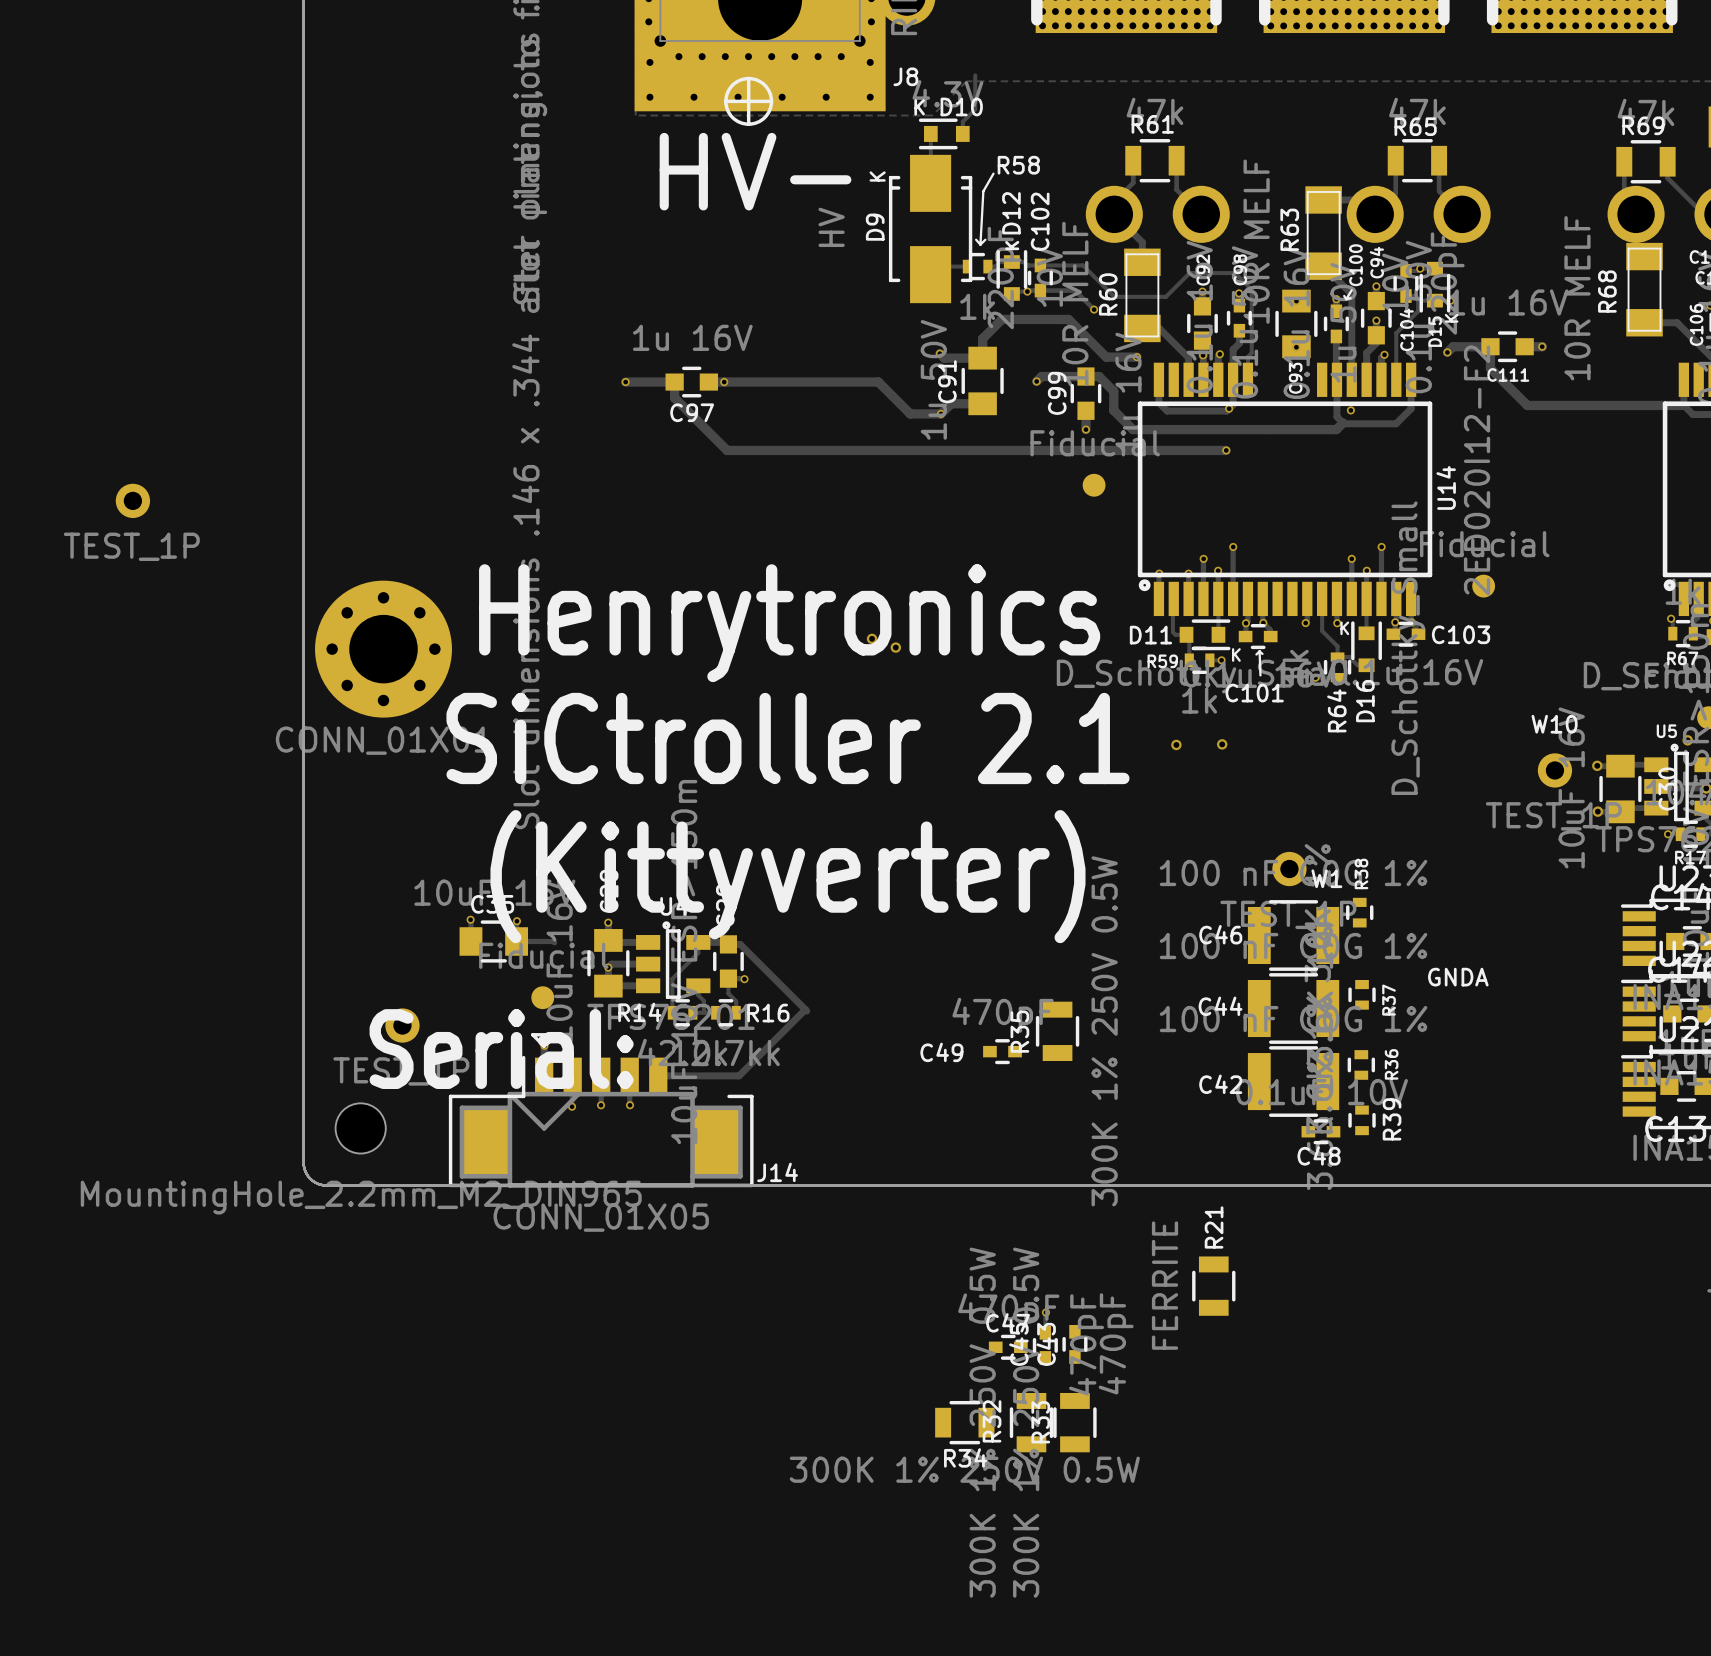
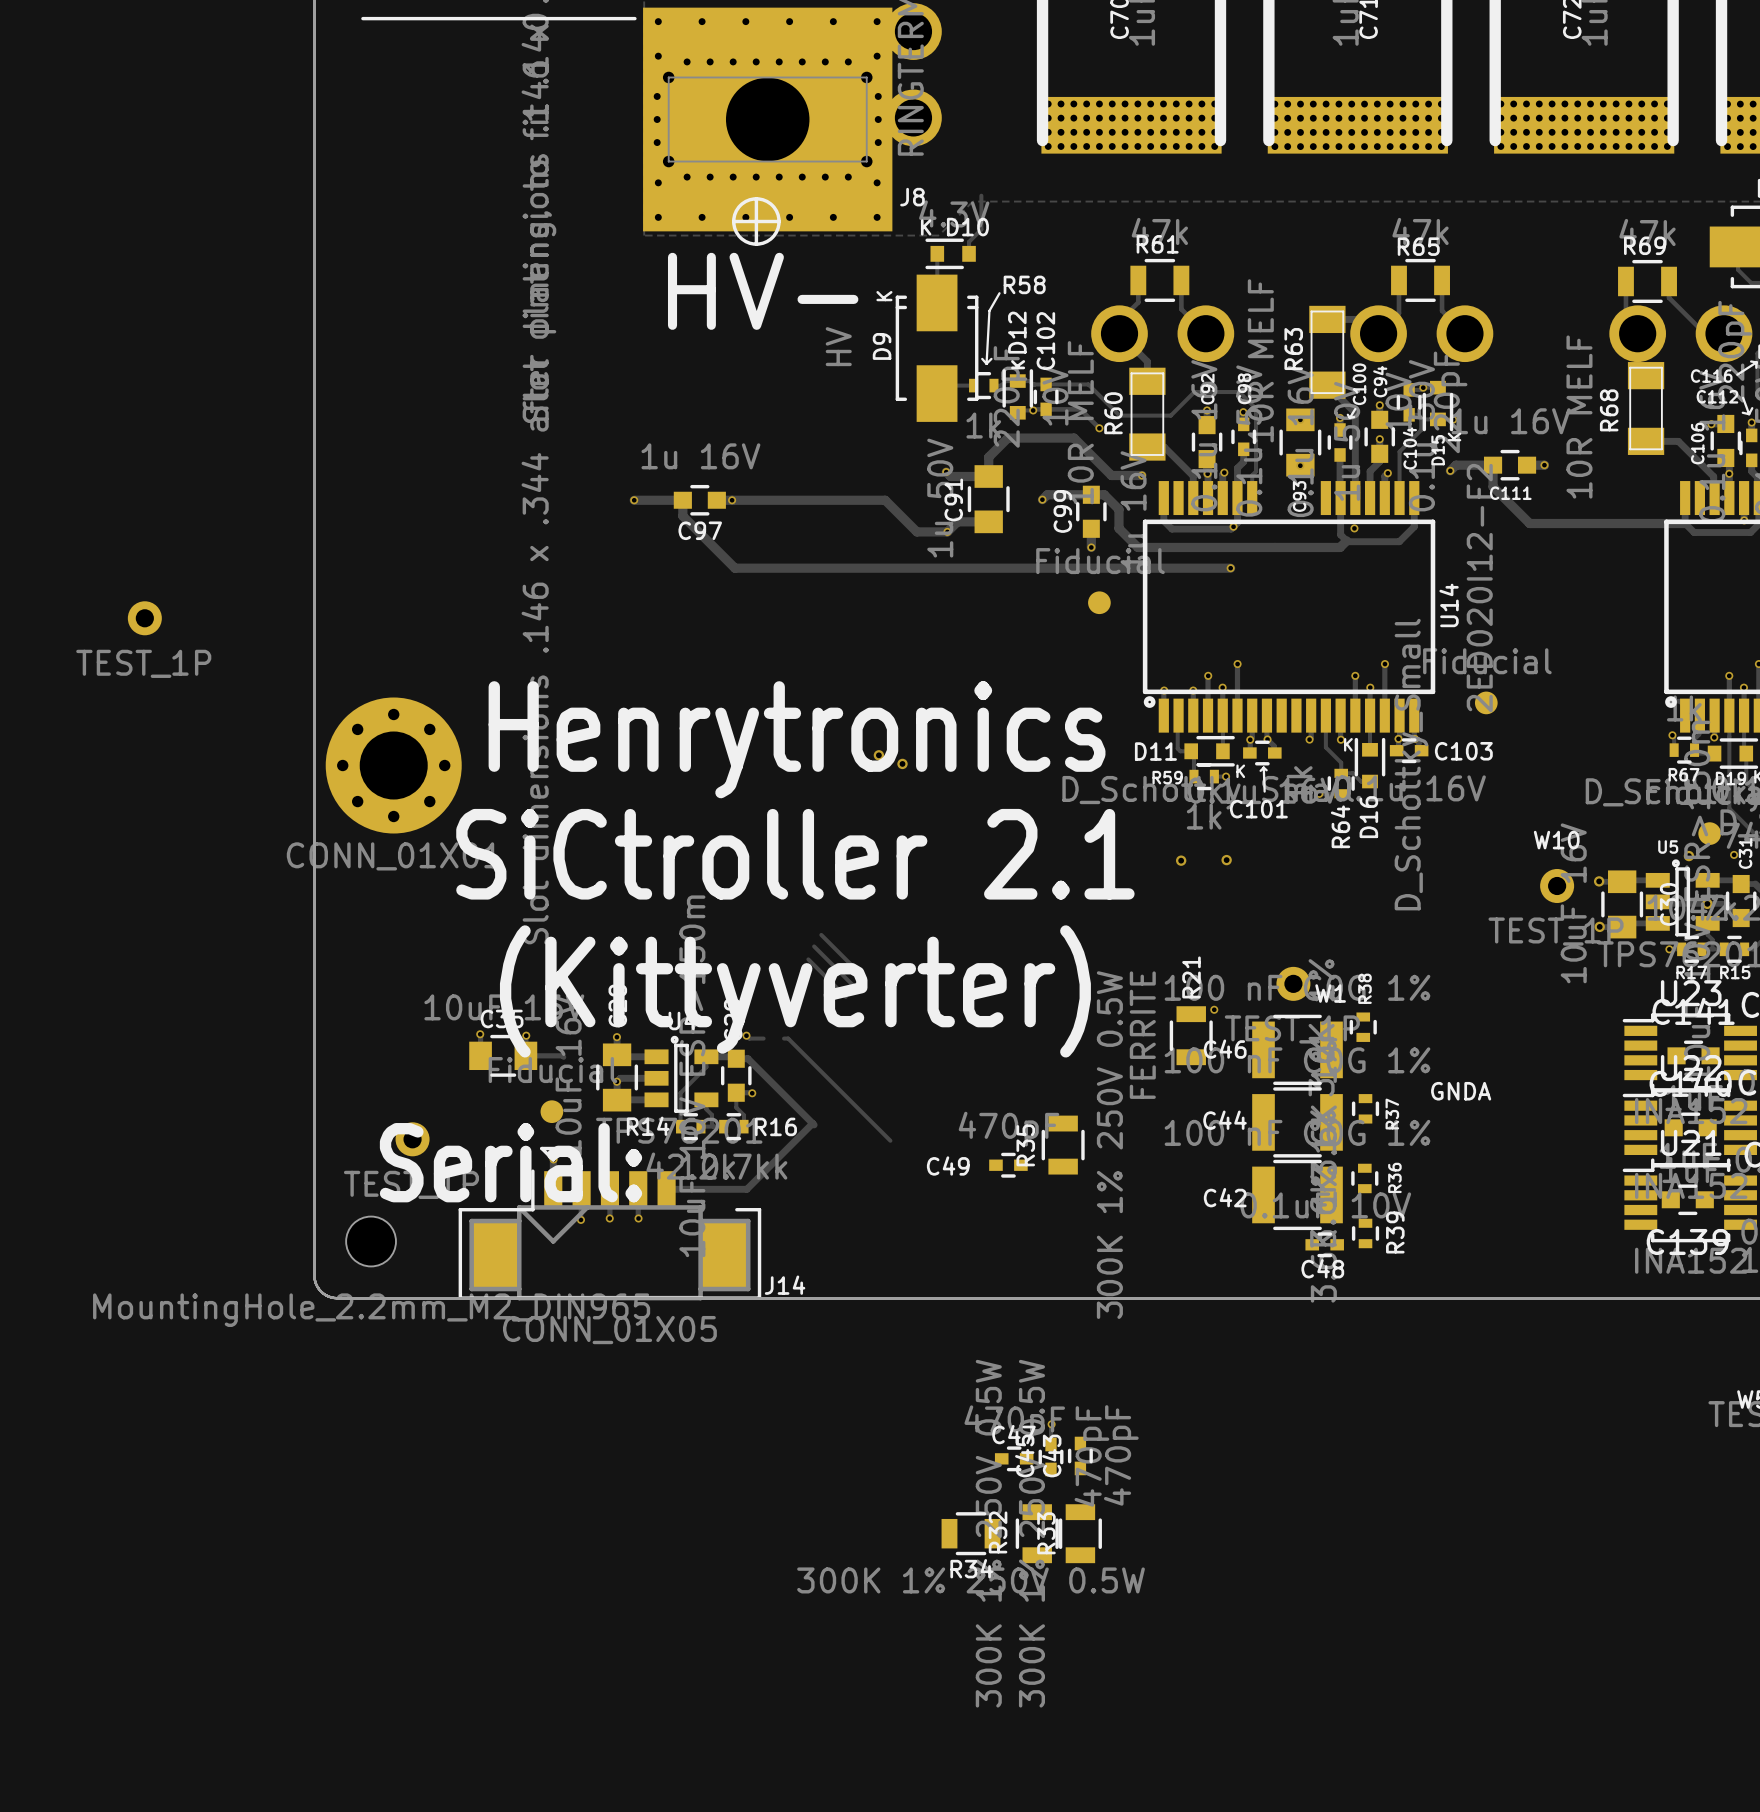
track: none -> (821, 934) (863, 975)
track: none -> (814, 946) (854, 986)
track: none -> (808, 959) (845, 996)
via: none -> (1214, 1009)
track: none -> (746, 1035) (749, 1038) (763, 1038)
via: none -> (746, 1035)
track: none -> (784, 1038) (788, 1038) (890, 1140)
R21 position: (1213, 1286) -> (1191, 1035)

